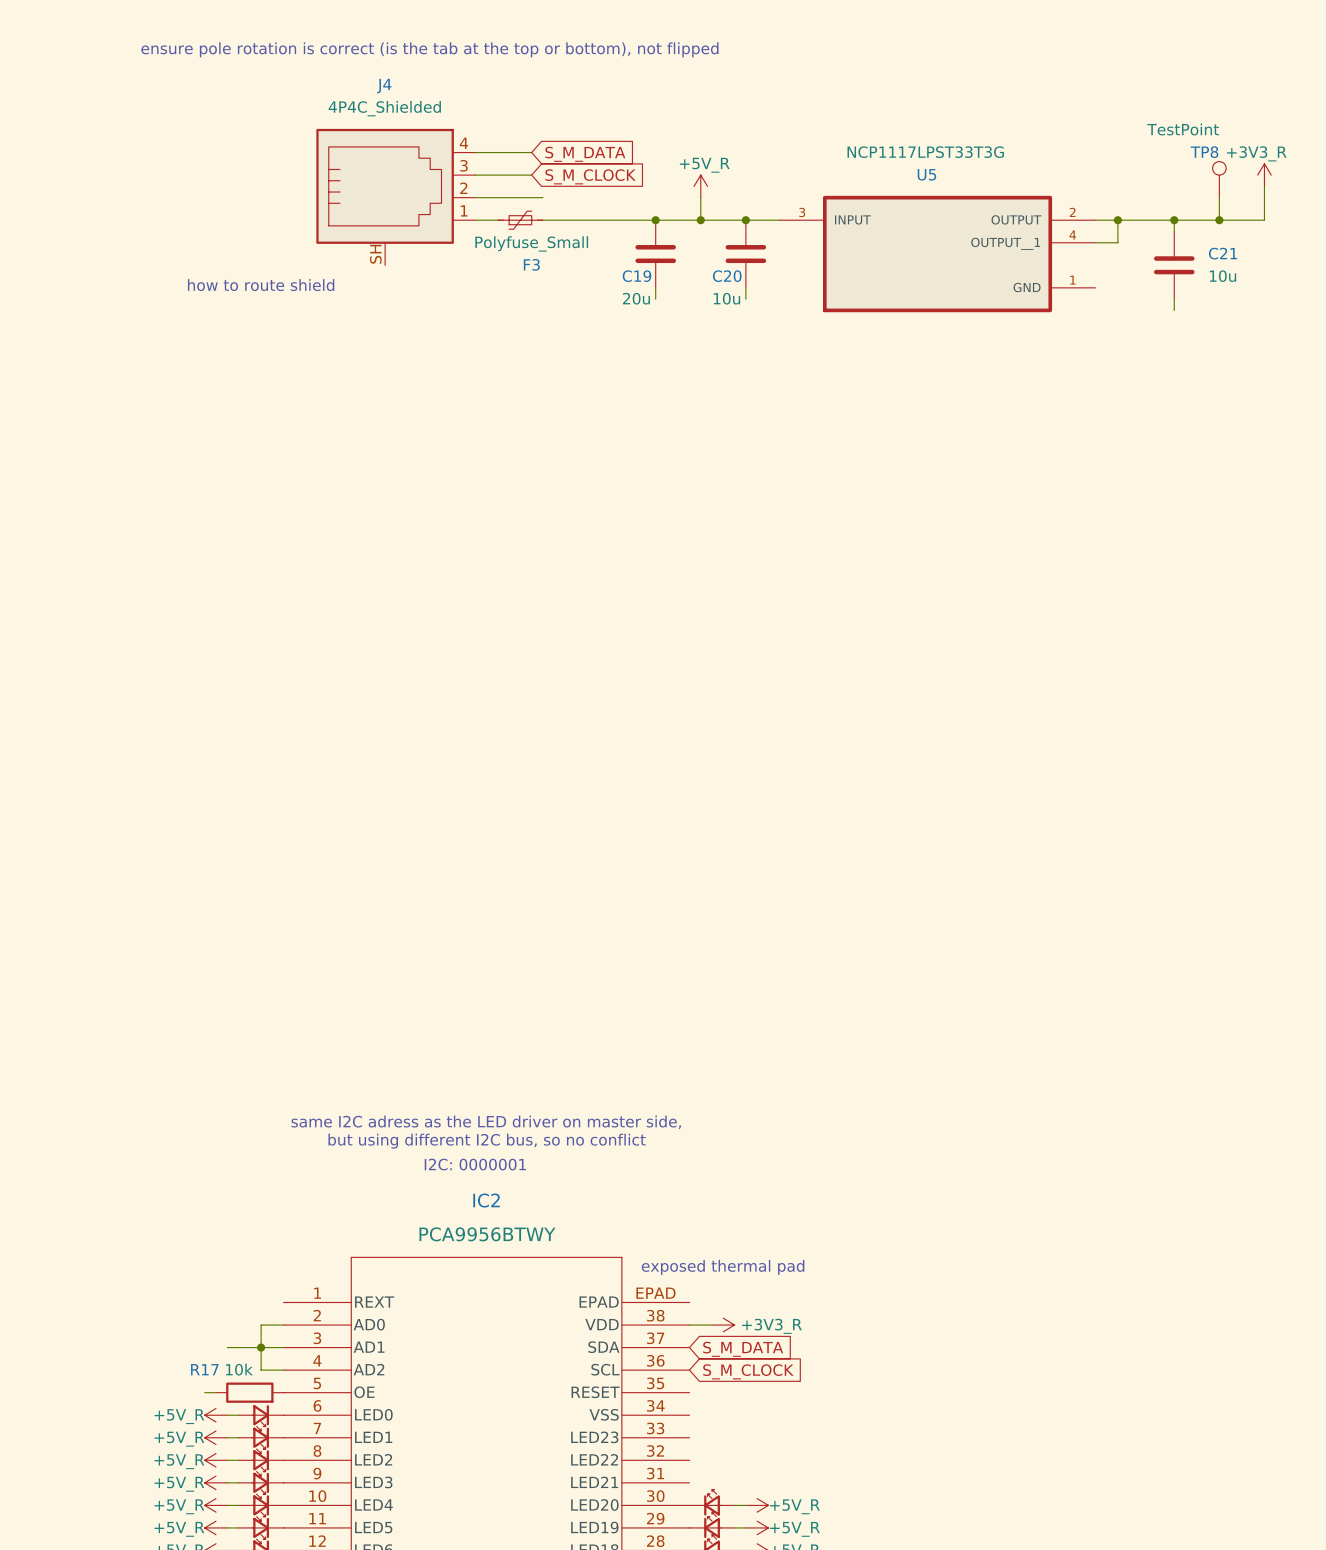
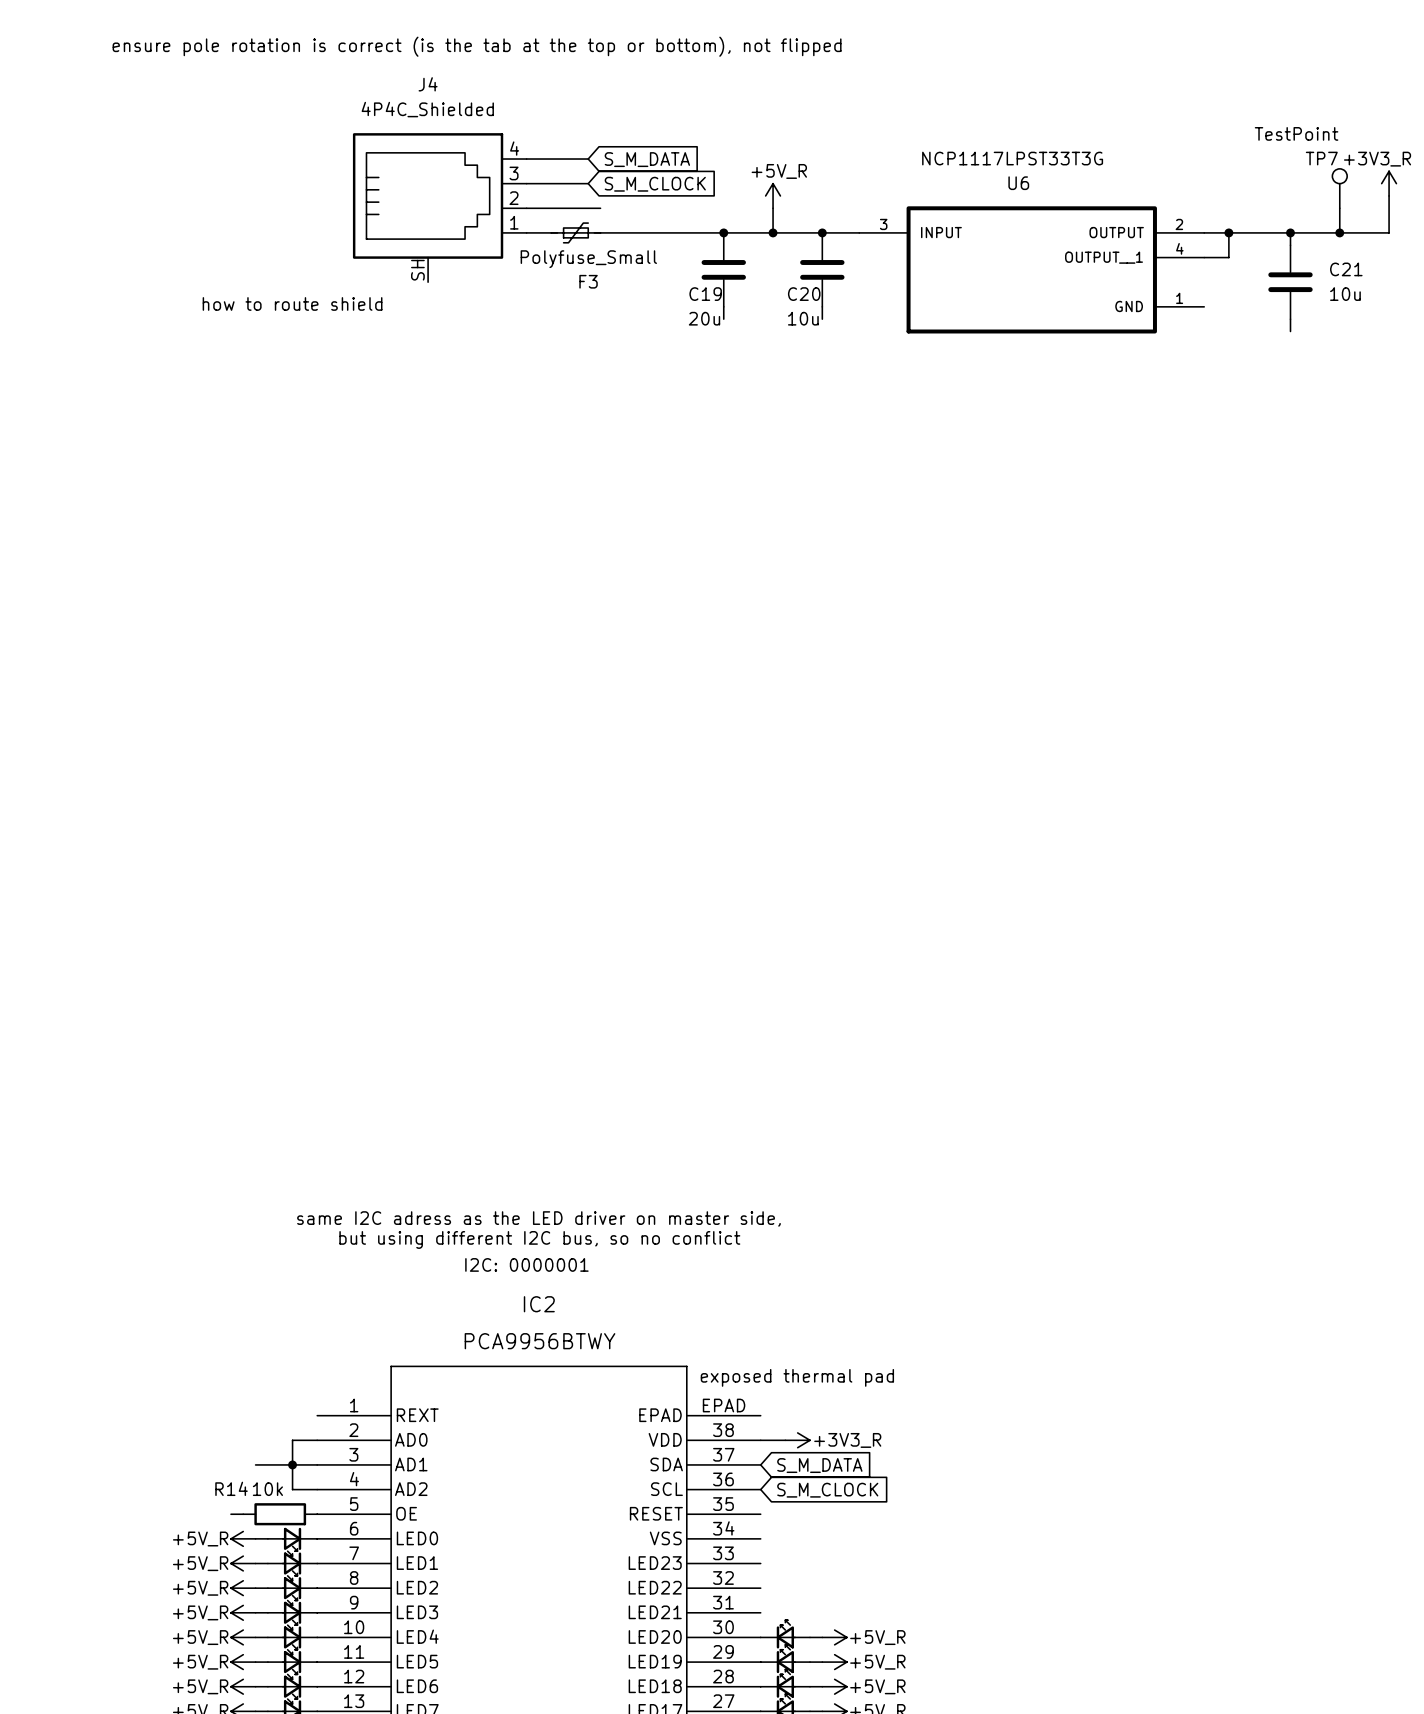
TP8 name: TP8 (1204, 152) -> TP7 (1321, 158)
U5 name: U5 (926, 174) -> U6 (1018, 183)
R17 name: R17 (204, 1369) -> R14 (231, 1488)

